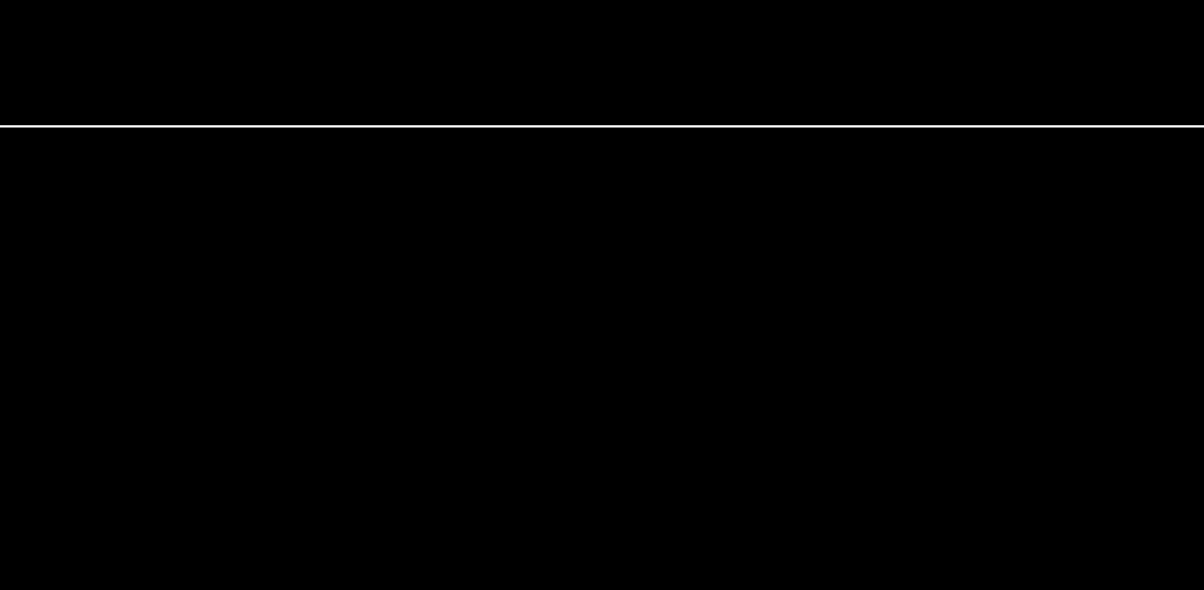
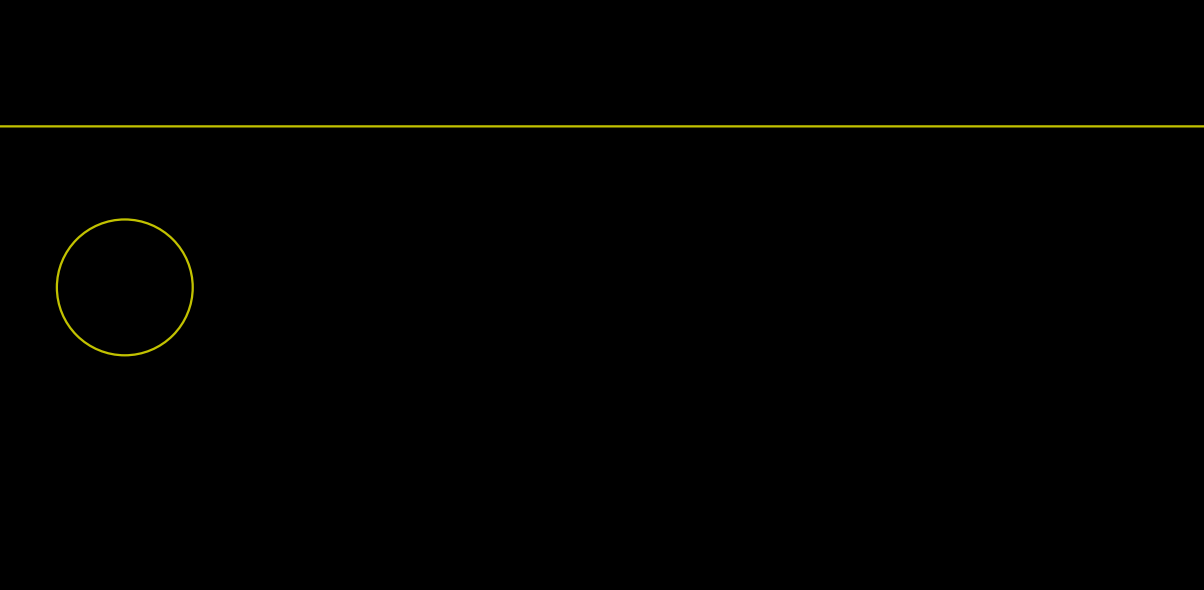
round board edge: none -> [55, 218, 194, 357]

